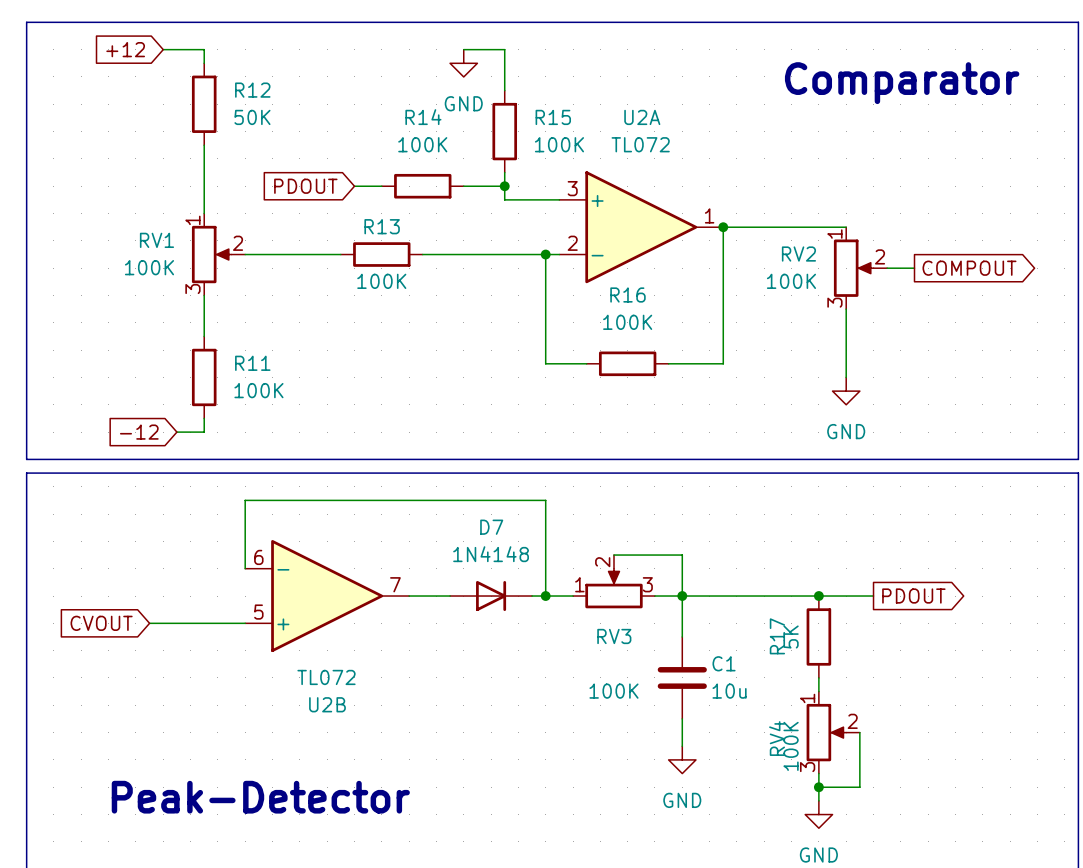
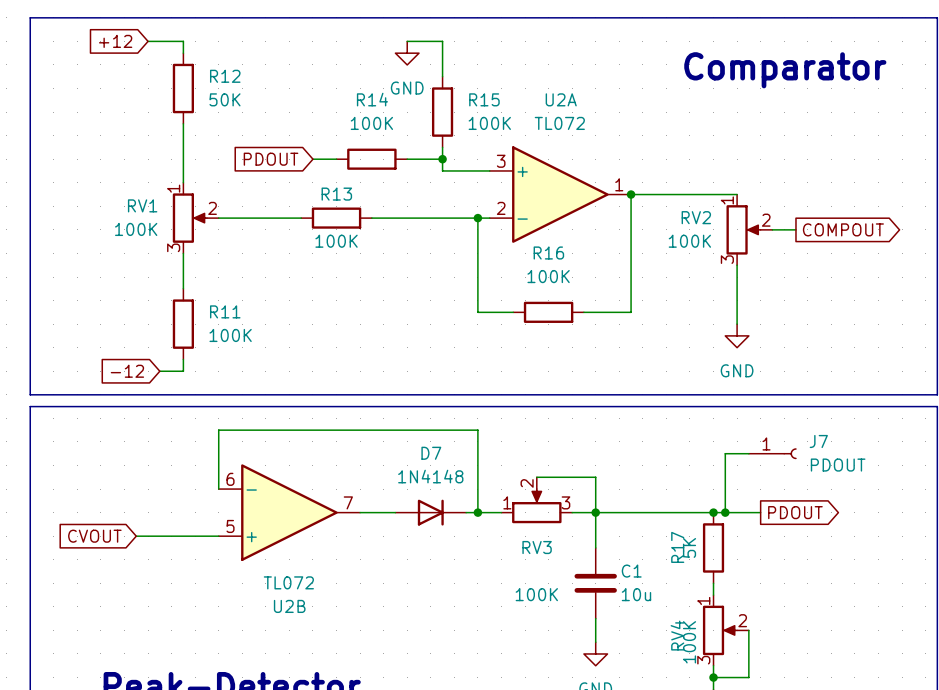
wire: none -> (748, 453) (725, 453) (725, 512)
J7: none -> PDOUT (772, 453)
junction: none -> (725, 512)

